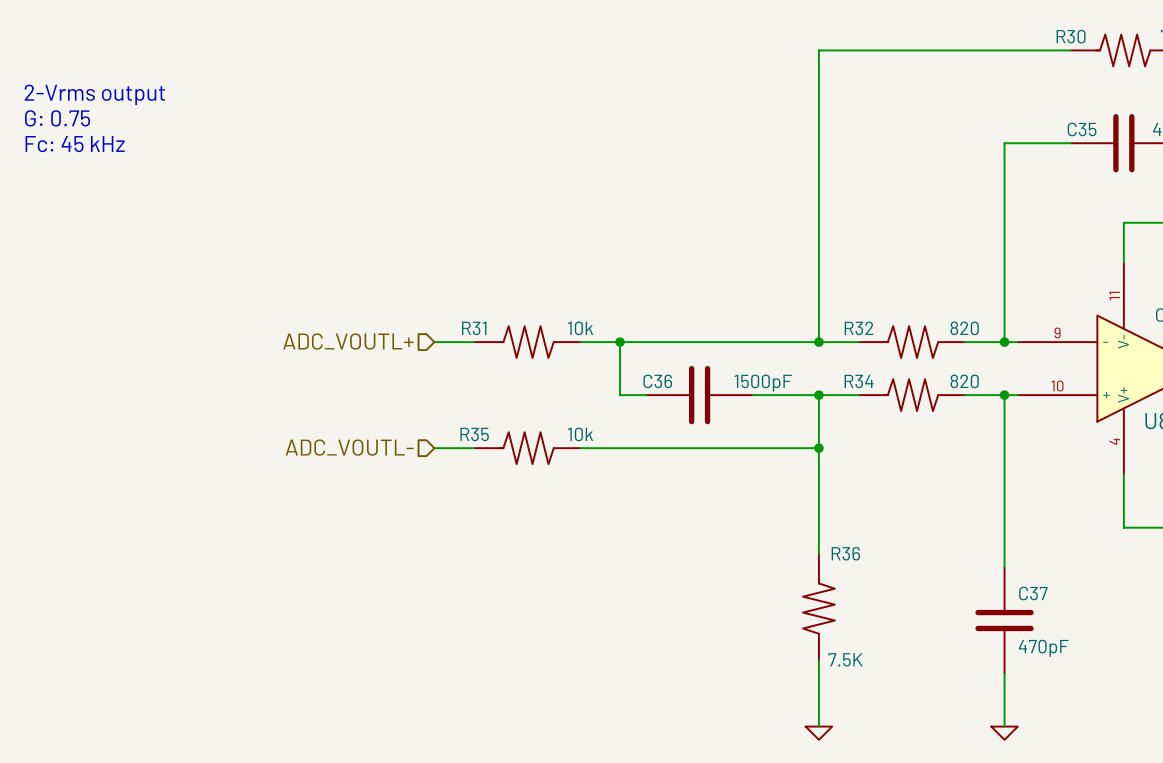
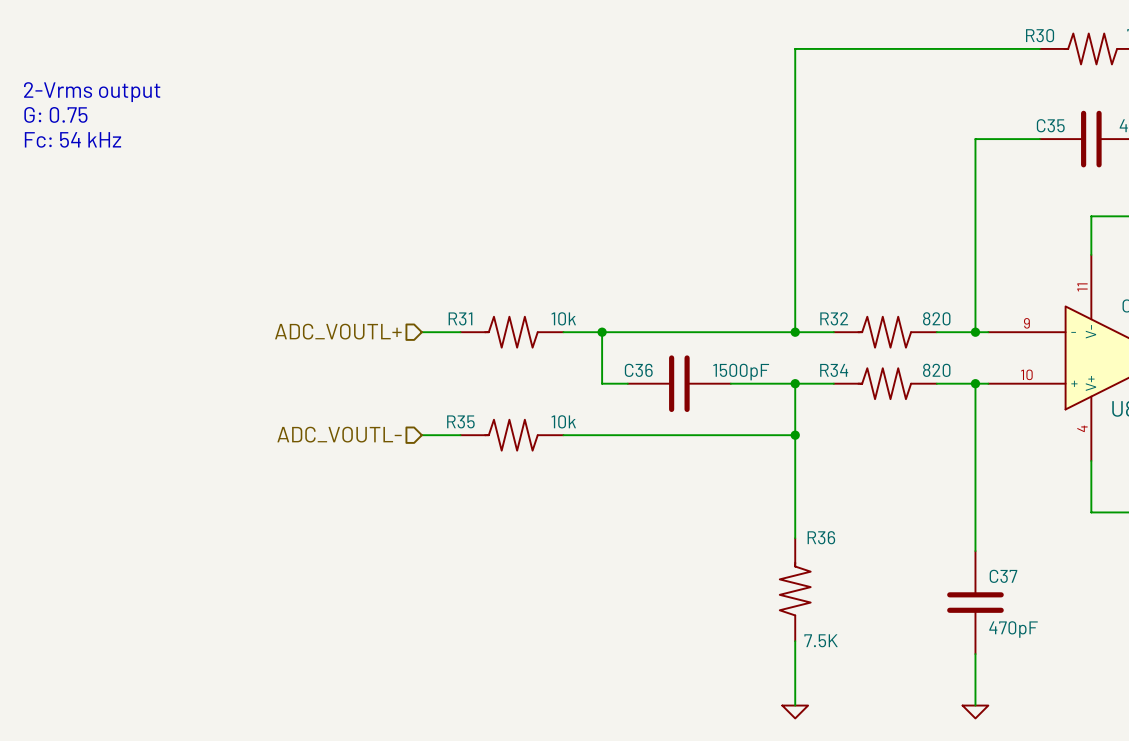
text: Fc: 45 kHz (75, 144) -> Fc: 54 kHz (72, 139)

